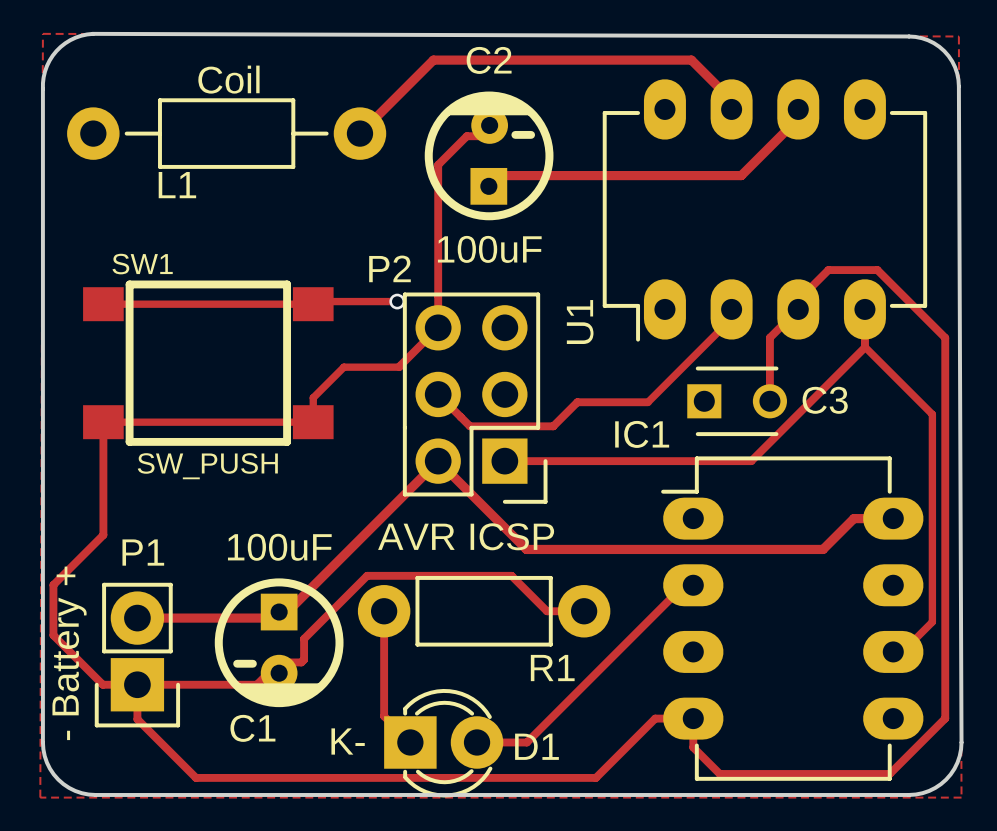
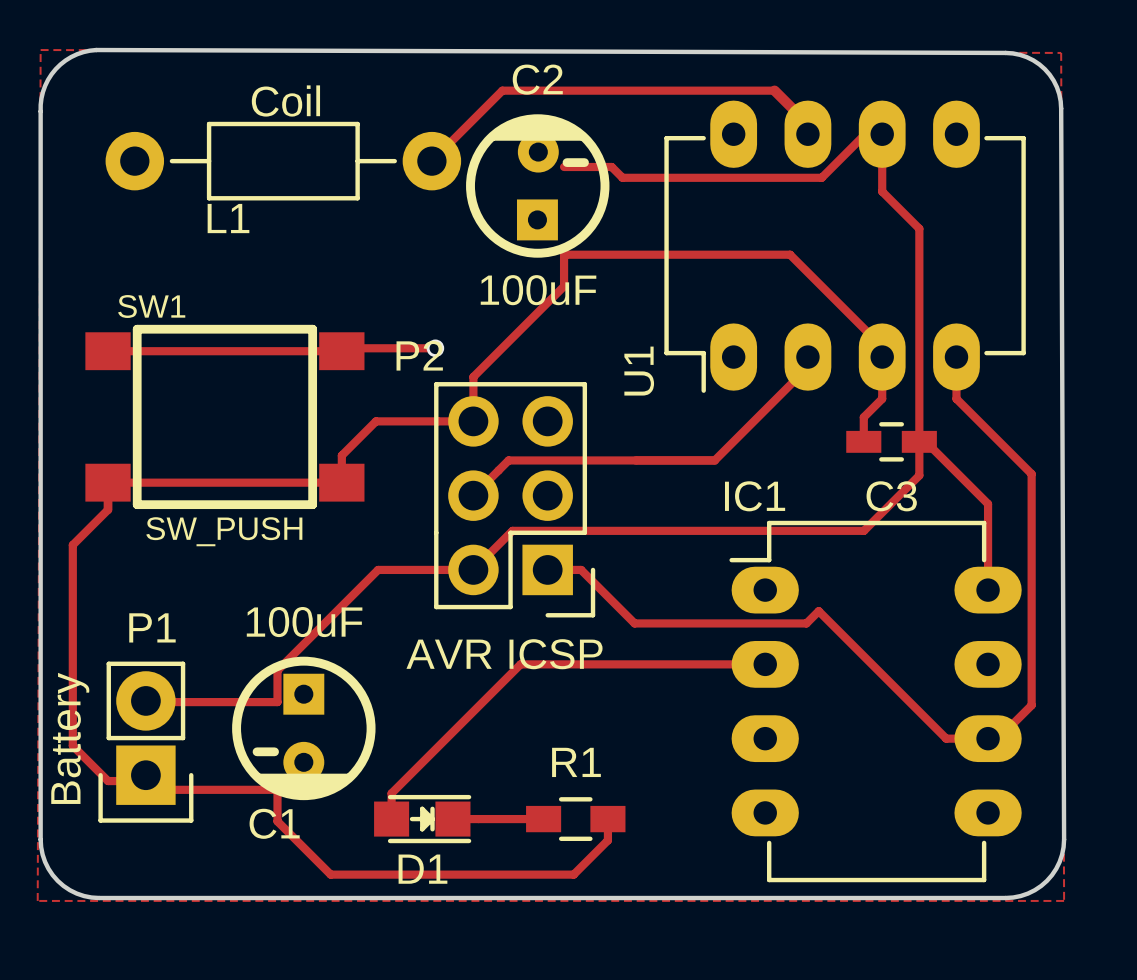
track: (701, 70) (691, 60) (433, 60) (359, 133) -> (774, 90) (502, 90) (431, 161)
track: none -> (865, 134) (821, 177) (622, 177) (611, 166) (564, 166)
track: (798, 118) (741, 175) (489, 175) -> (882, 144) (882, 191) (919, 228) (919, 475) (863, 530) (512, 530) (473, 569) (378, 569) (277, 670) (277, 702) (150, 702)
L1 position: (226, 133) -> (283, 161)
track: (489, 136) (466, 136) (438, 164) (438, 327) (399, 366) -> (882, 346) (790, 254) (564, 254) (564, 286) (473, 376) (473, 421) (437, 421)
track: (798, 300) (828, 270) (877, 270) (945, 337) (945, 718) (889, 773) (719, 773) (693, 747) (693, 718) (655, 718) (595, 777) (196, 777) (137, 719) (137, 684) -> none
track: (798, 309) (769, 337) (769, 401) -> (882, 357) (882, 398) (863, 417) (863, 441)
track: (864, 309) (864, 347) (751, 461) (504, 461) -> none
C3 footprint: [687, 366, 787, 437] -> [846, 422, 937, 462]
track: (438, 394) (470, 426) (553, 426) (577, 402) -> (473, 495) (508, 460) (636, 460)
P2 position: (475, 398) -> (514, 499)
C3 name position: C3 (825, 400) -> C3 (891, 496)
IC1 name position: IC1 (642, 434) -> IC1 (755, 496)
track: (103, 446) (103, 535) (53, 585) (53, 635) (102, 684) (256, 684) (279, 662) (301, 662) (304, 659) (304, 638) (367, 575) (511, 575) (547, 611) (584, 611) -> (108, 509) (72, 545) (72, 745) (108, 781) (145, 781)
track: none -> (547, 569) (581, 569) (634, 623) (806, 623) (818, 611) (946, 738) (988, 738)
track: (893, 518) (853, 518) (823, 549) (526, 549) (438, 461) (279, 620) (279, 623) (274, 618) (137, 618) -> (988, 590) (988, 503) (925, 441) (919, 441)
R1 footprint: [357, 575, 611, 647] -> [526, 797, 626, 842]
track: (684, 585) (526, 742) (477, 742) -> (755, 664) (520, 664) (391, 793) (391, 819)
track: (384, 611) (384, 716) (410, 742) -> none
P1 value: - Battery + (69, 653) -> Battery (70, 738)
R1 name position: R1 (552, 668) -> R1 (576, 762)
D1 footprint: [384, 688, 504, 798] -> [374, 794, 472, 844]
track: none -> (154, 789) (277, 789) (277, 821) (330, 874) (573, 874) (607, 840) (607, 819)
track: none -> (452, 819) (543, 819)
D1 name position: D1 (536, 746) -> D1 (422, 869)

